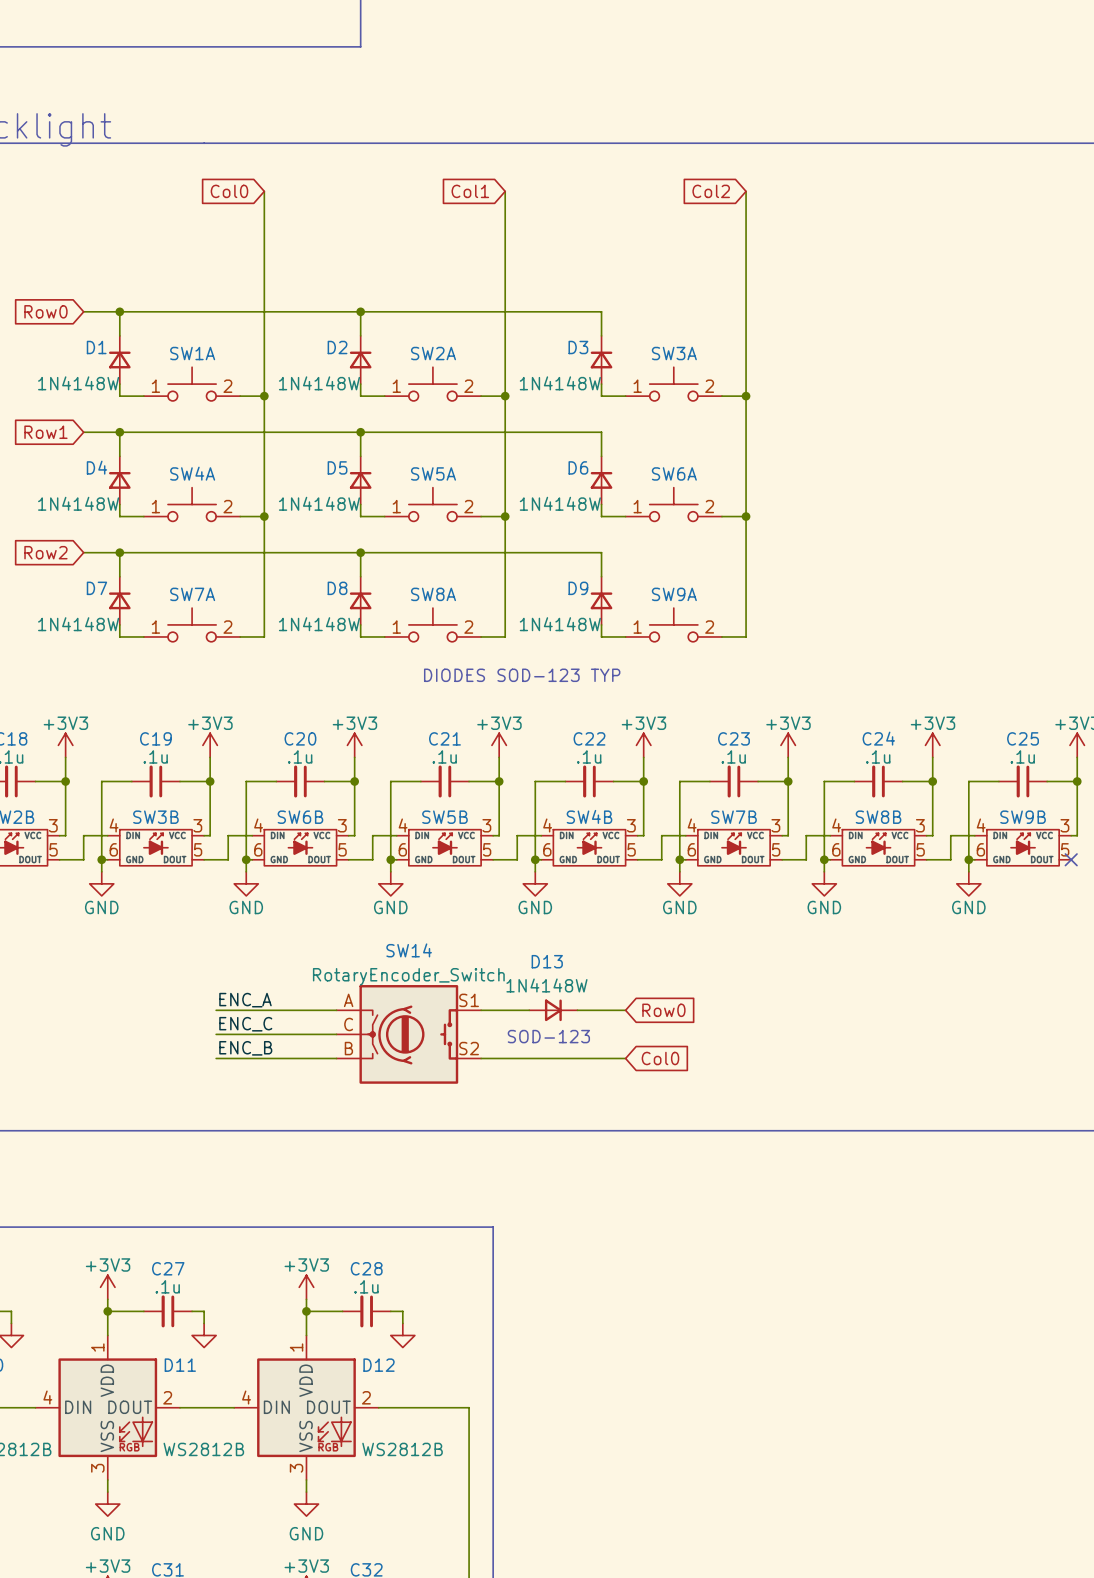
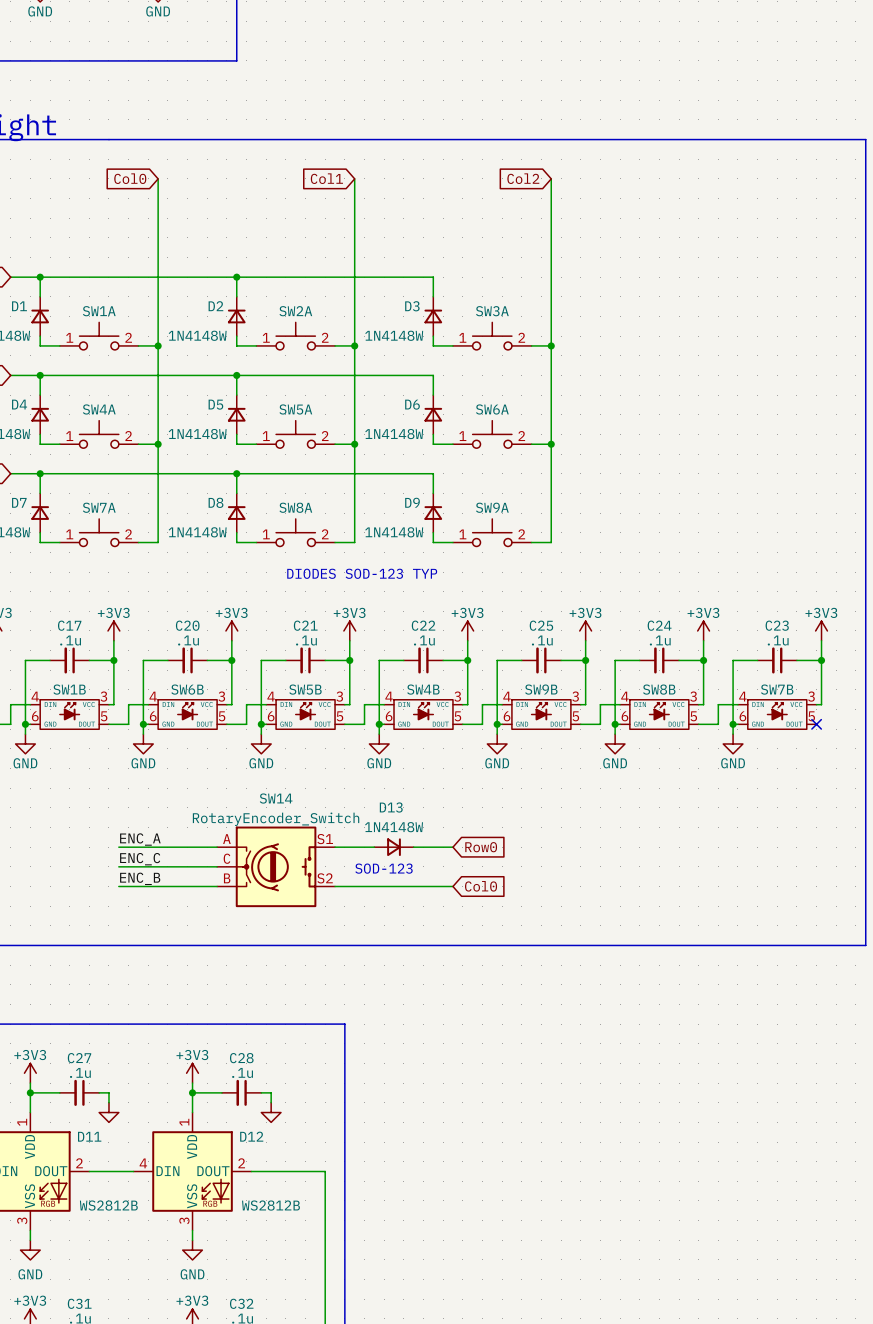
C19 name: C19 (155, 738) -> C17 (69, 625)
C23 name: C23 (734, 738) -> C25 (541, 625)
C25 name: C25 (1023, 738) -> C23 (777, 625)
SW3B name: SW3B (155, 817) -> SW1B (69, 689)
SW7B name: SW7B (734, 817) -> SW9B (541, 689)
SW9B name: SW9B (1023, 817) -> SW7B (777, 689)

